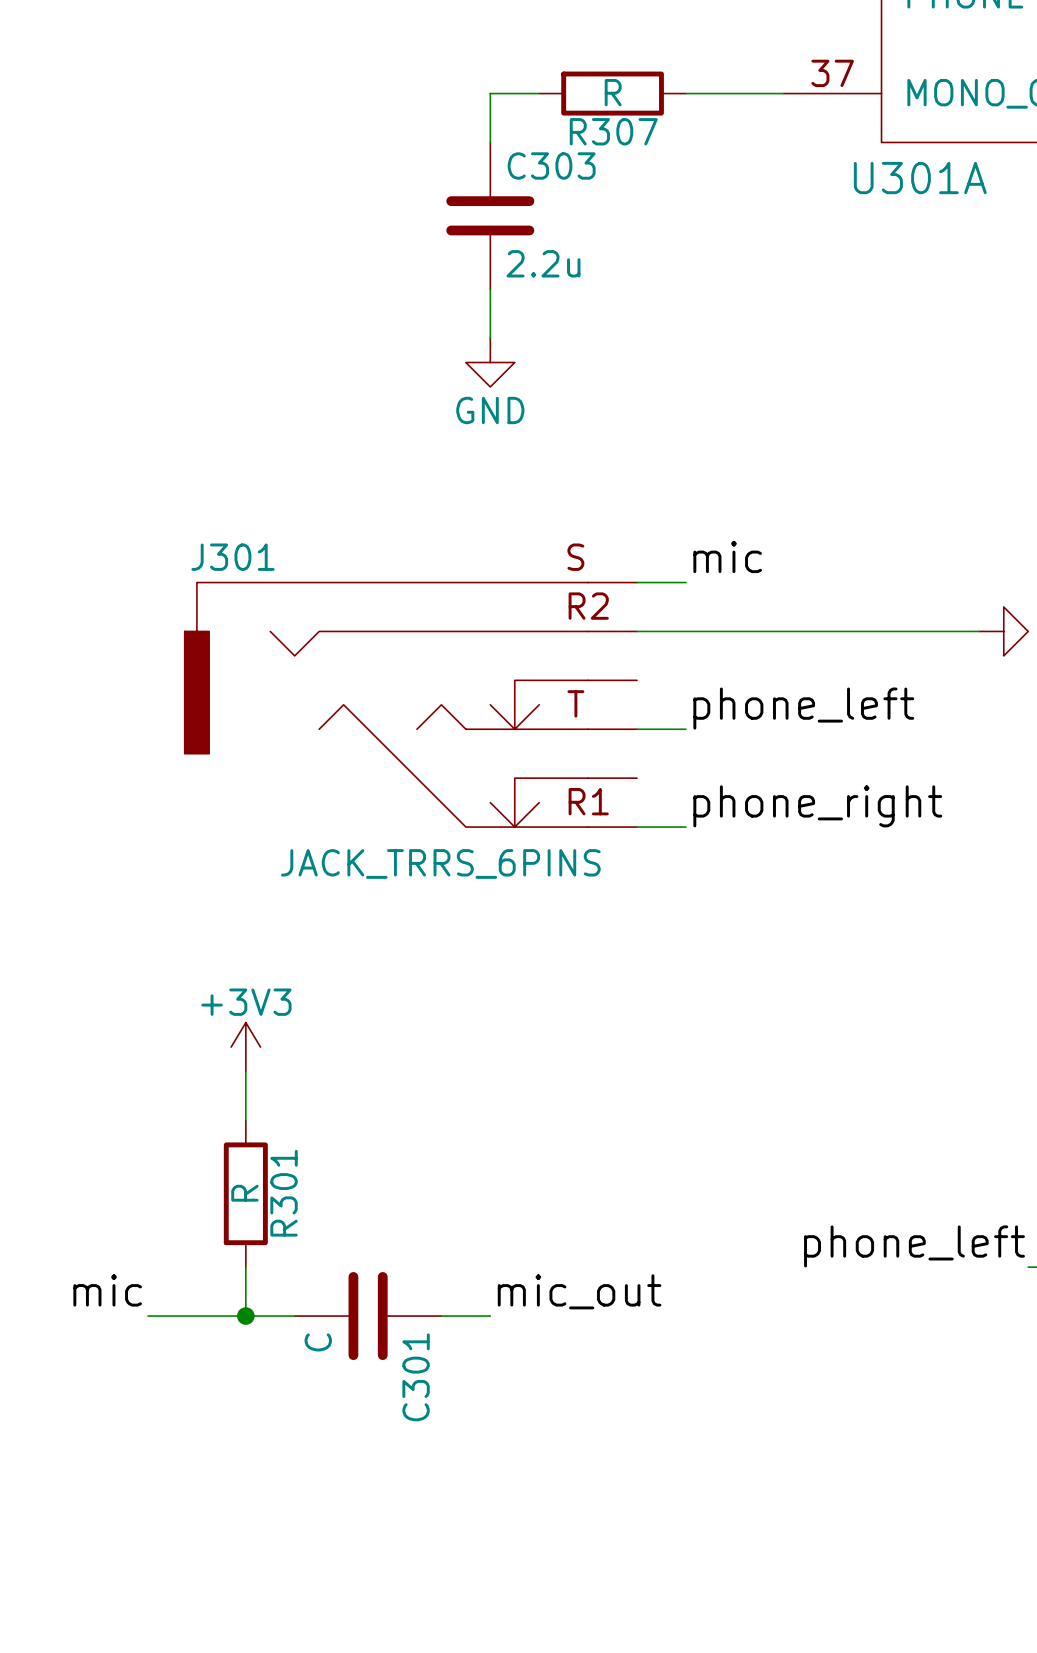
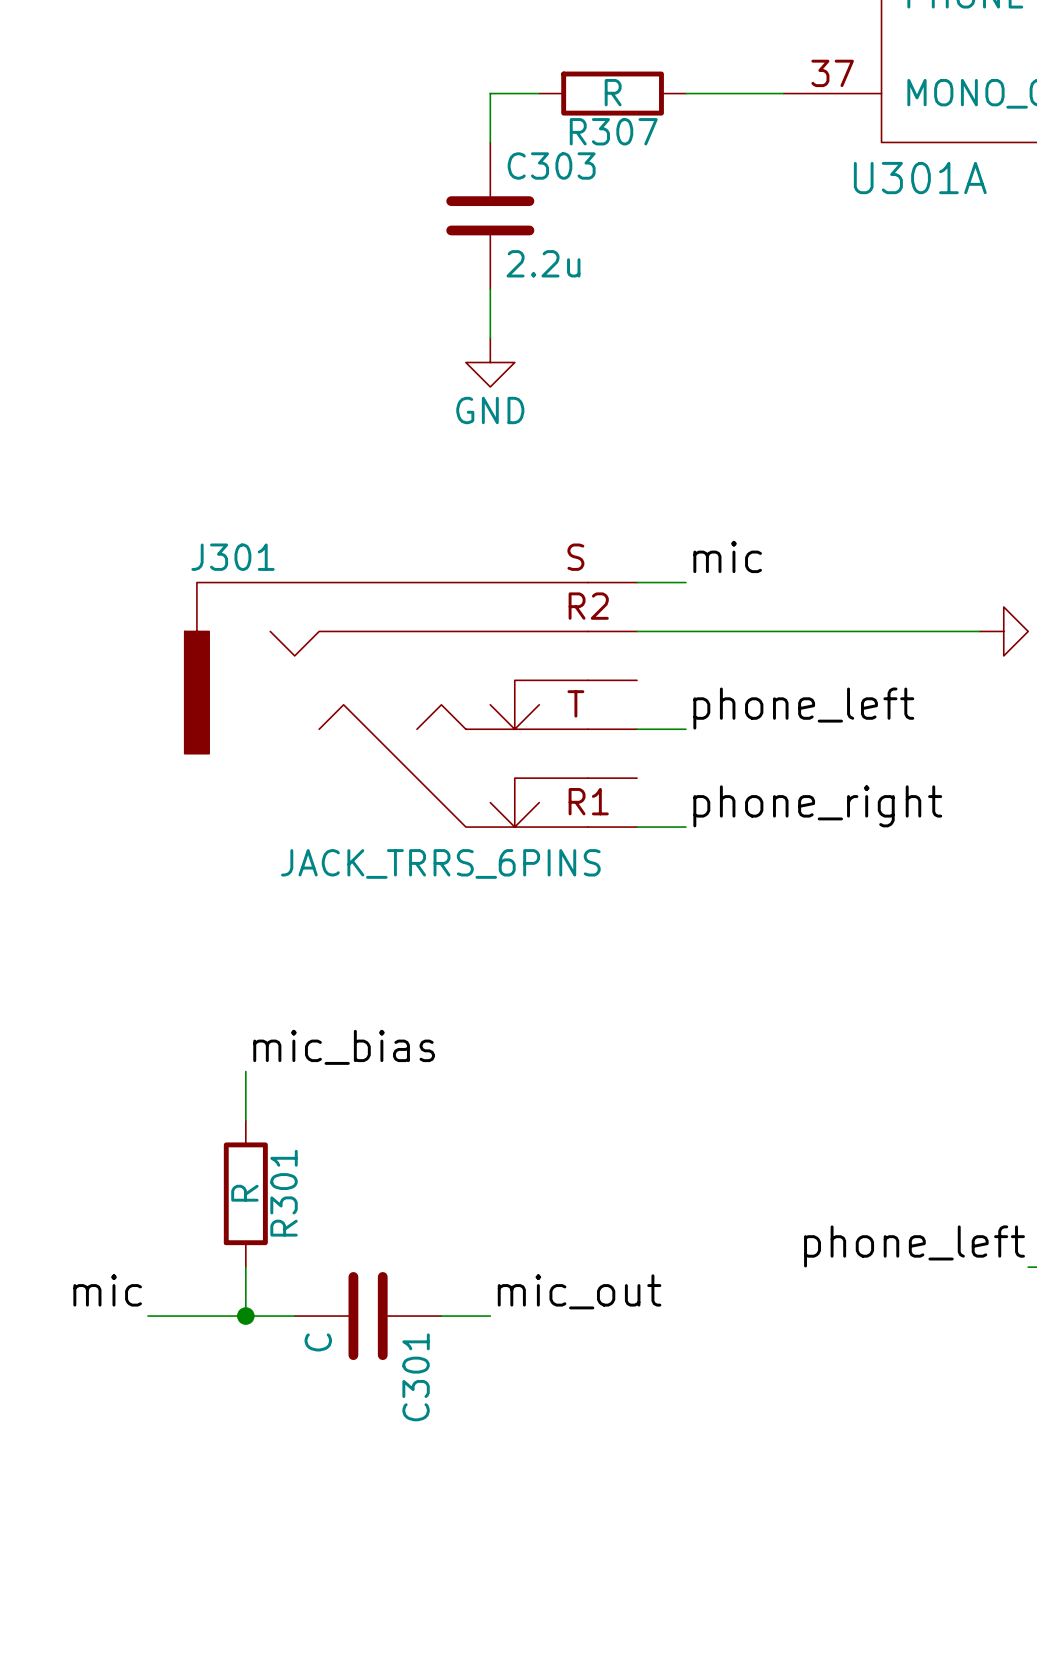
power symbol: +3V3 (245, 1047) -> none
label: none -> mic_bias (344, 1047)

